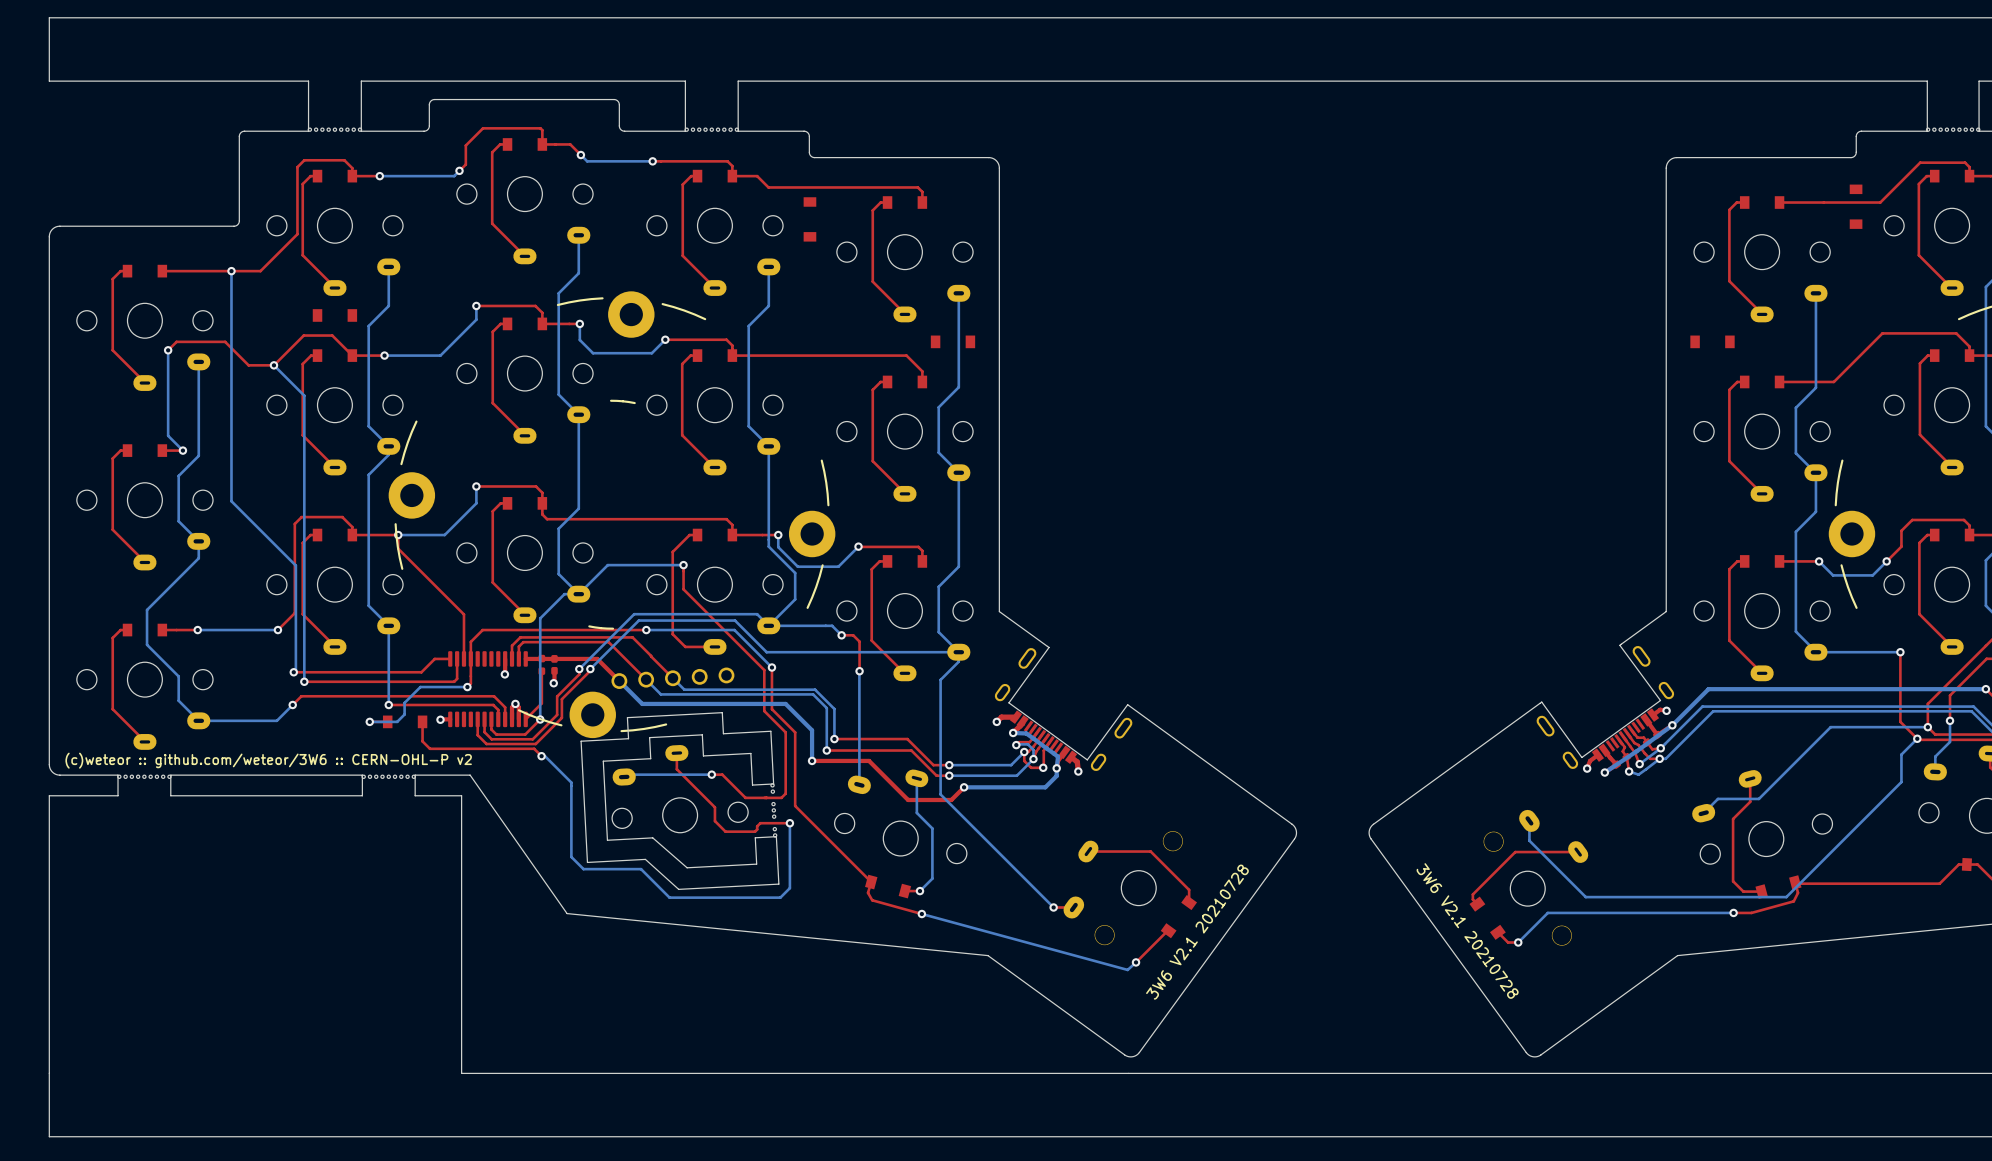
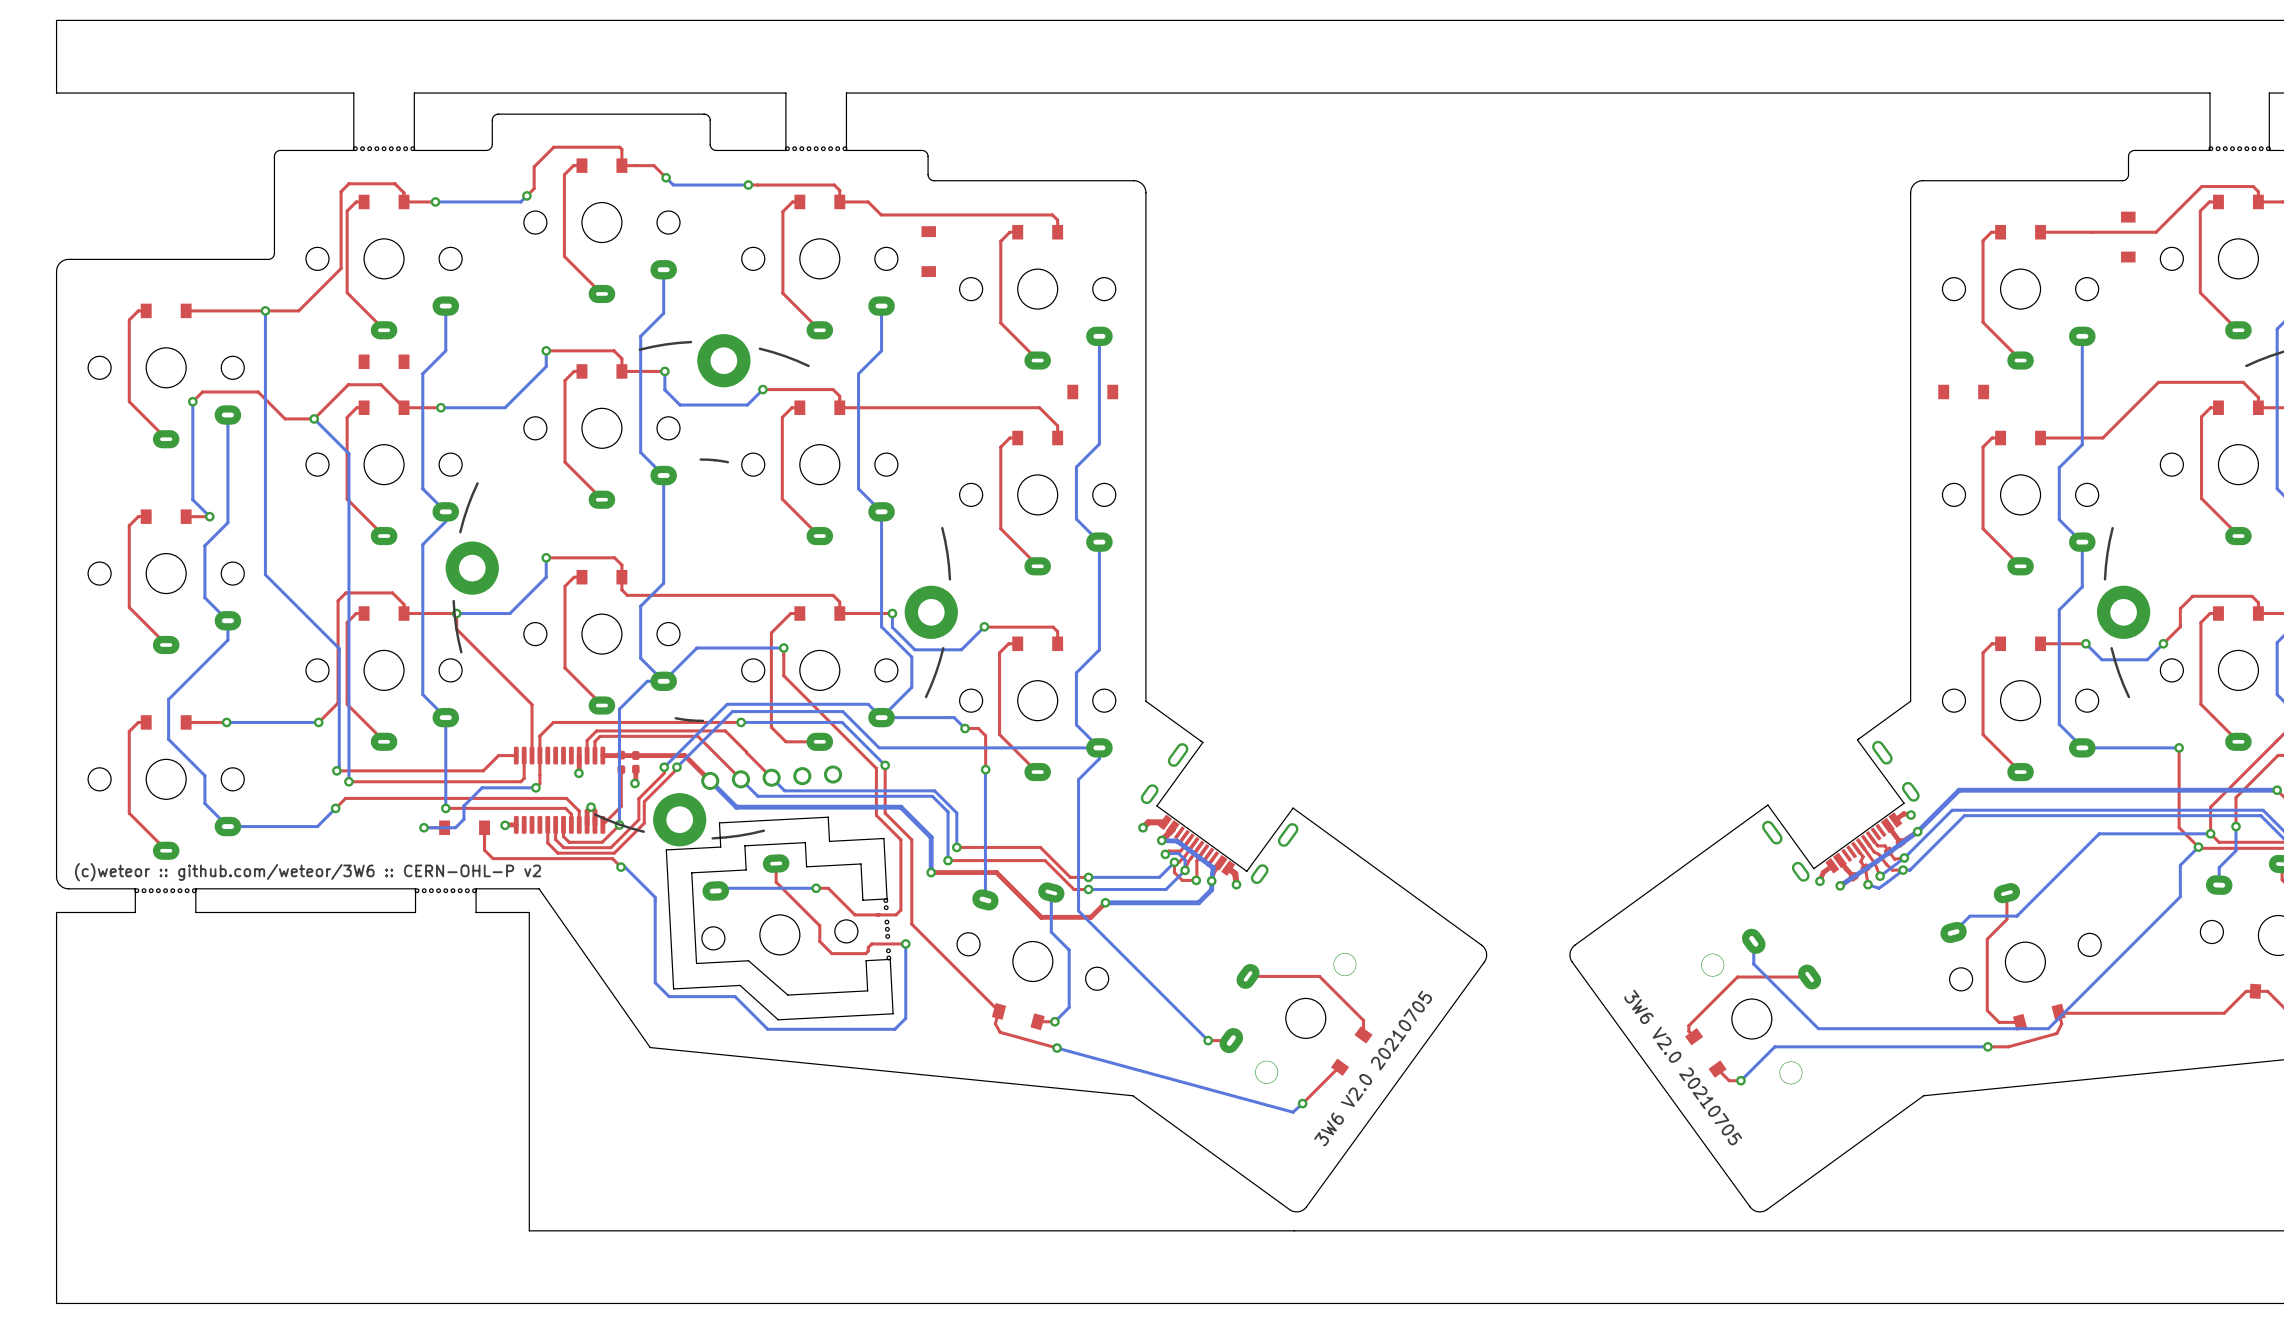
text: 3W6 V2.1 20210728 (1467, 931) -> 3W6 V2.0 20210705 (1683, 1067)
text: 3W6 V2.1 20210728 (1197, 932) -> 3W6 V2.0 20210705 (1373, 1068)

